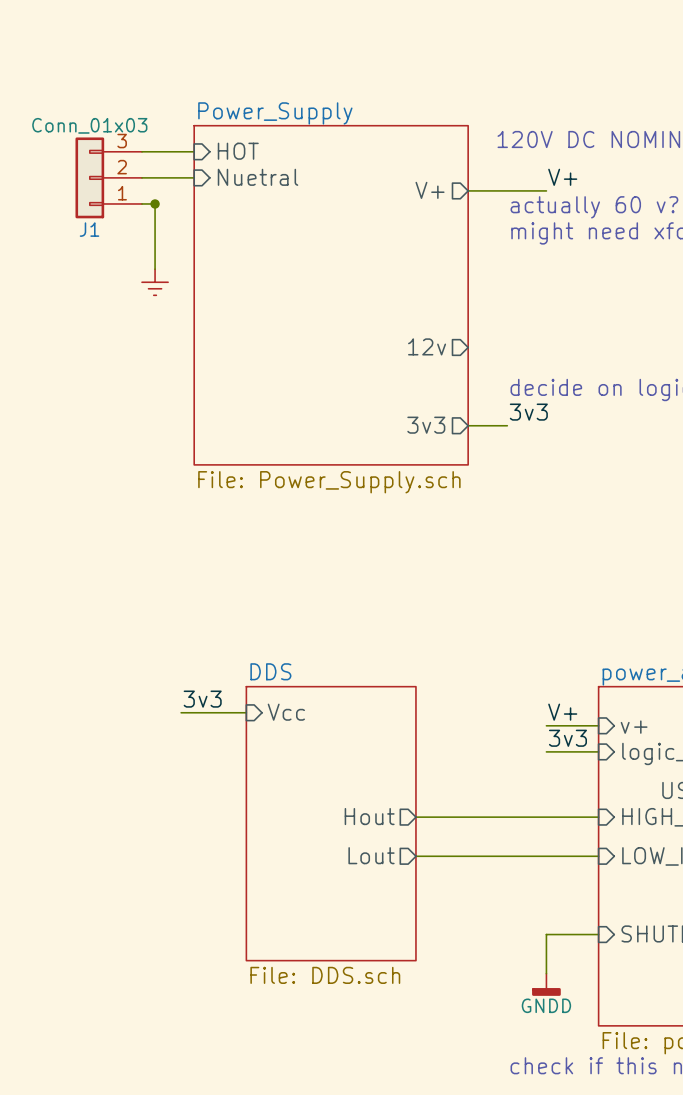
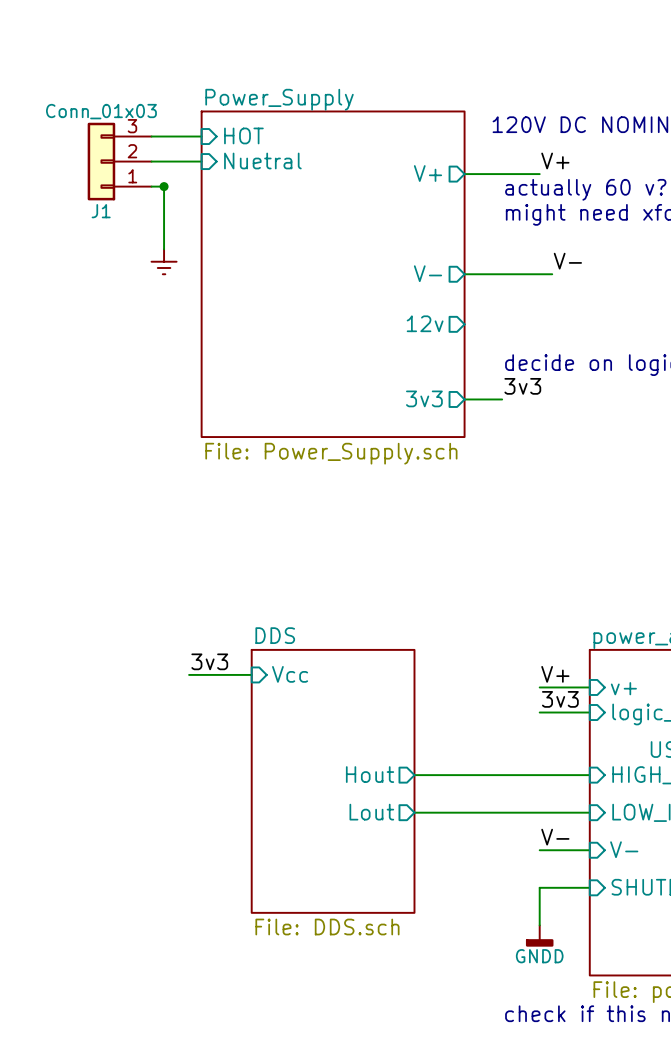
label: none -> V- (567, 261)
sheet pin: none -> V- (427, 273)
wire: none -> (464, 274) (552, 274)
label: none -> V- (555, 837)
sheet pin: none -> V- (624, 849)
wire: none -> (539, 850) (589, 850)

